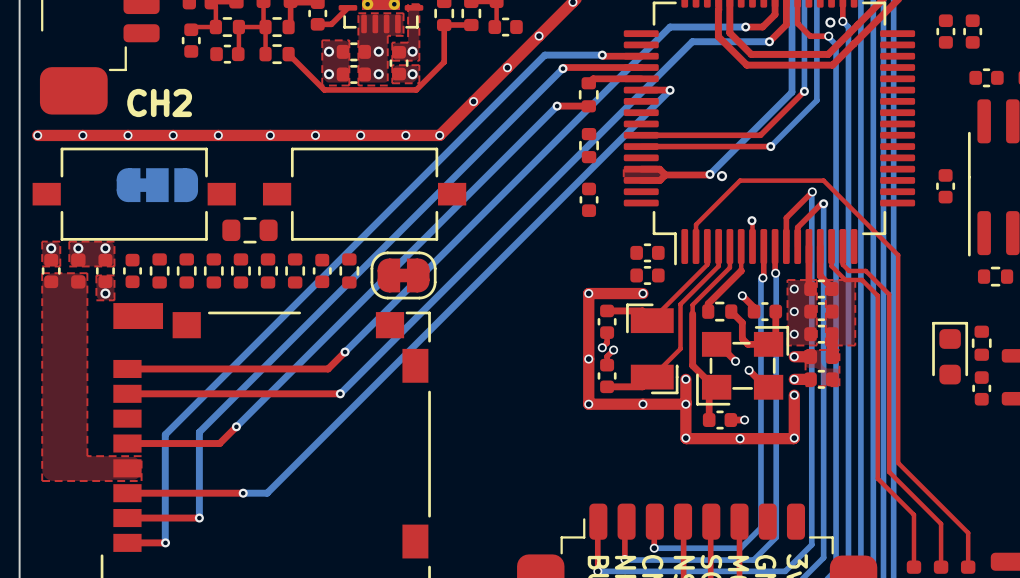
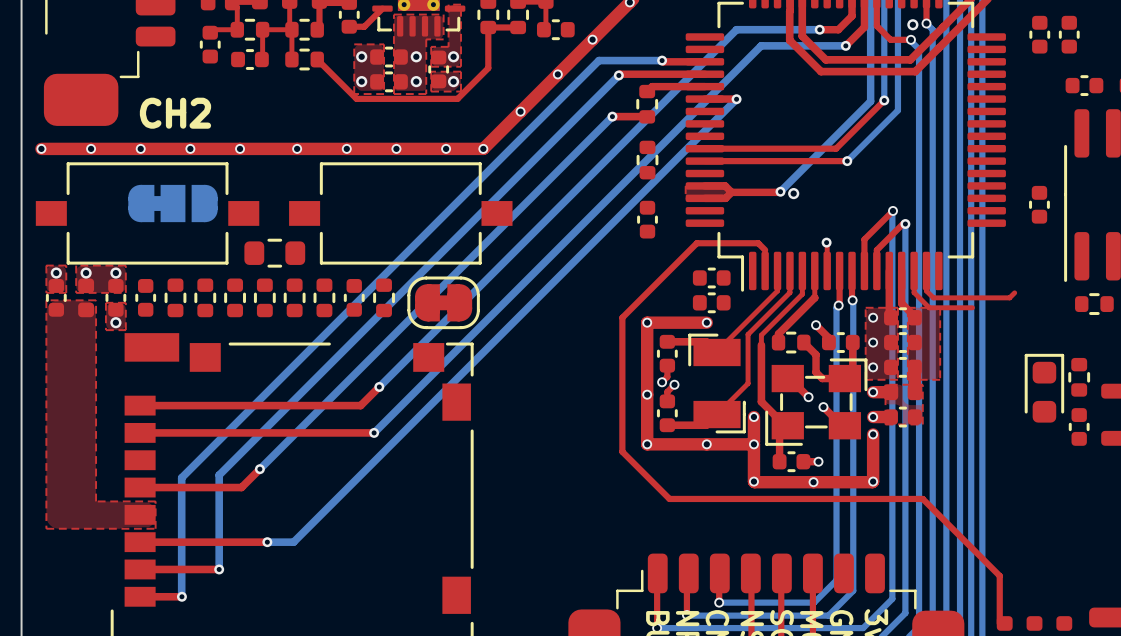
top track: (696, 227) (696, 224) (740, 180) (823, 180) (898, 255) (898, 462) (968, 532) (968, 567) -> (765, 250) (758, 243) (696, 243) (622, 317) (622, 451) (669, 498) (922, 498) (999, 575) (999, 623)
top track: (865, 270) (889, 294) (889, 471) (941, 523) (941, 567) -> (951, 297) (1009, 297) (1014, 292)
top track: (862, 279) (877, 295) (877, 478) (913, 514) (913, 567) -> (947, 307) (972, 307)

